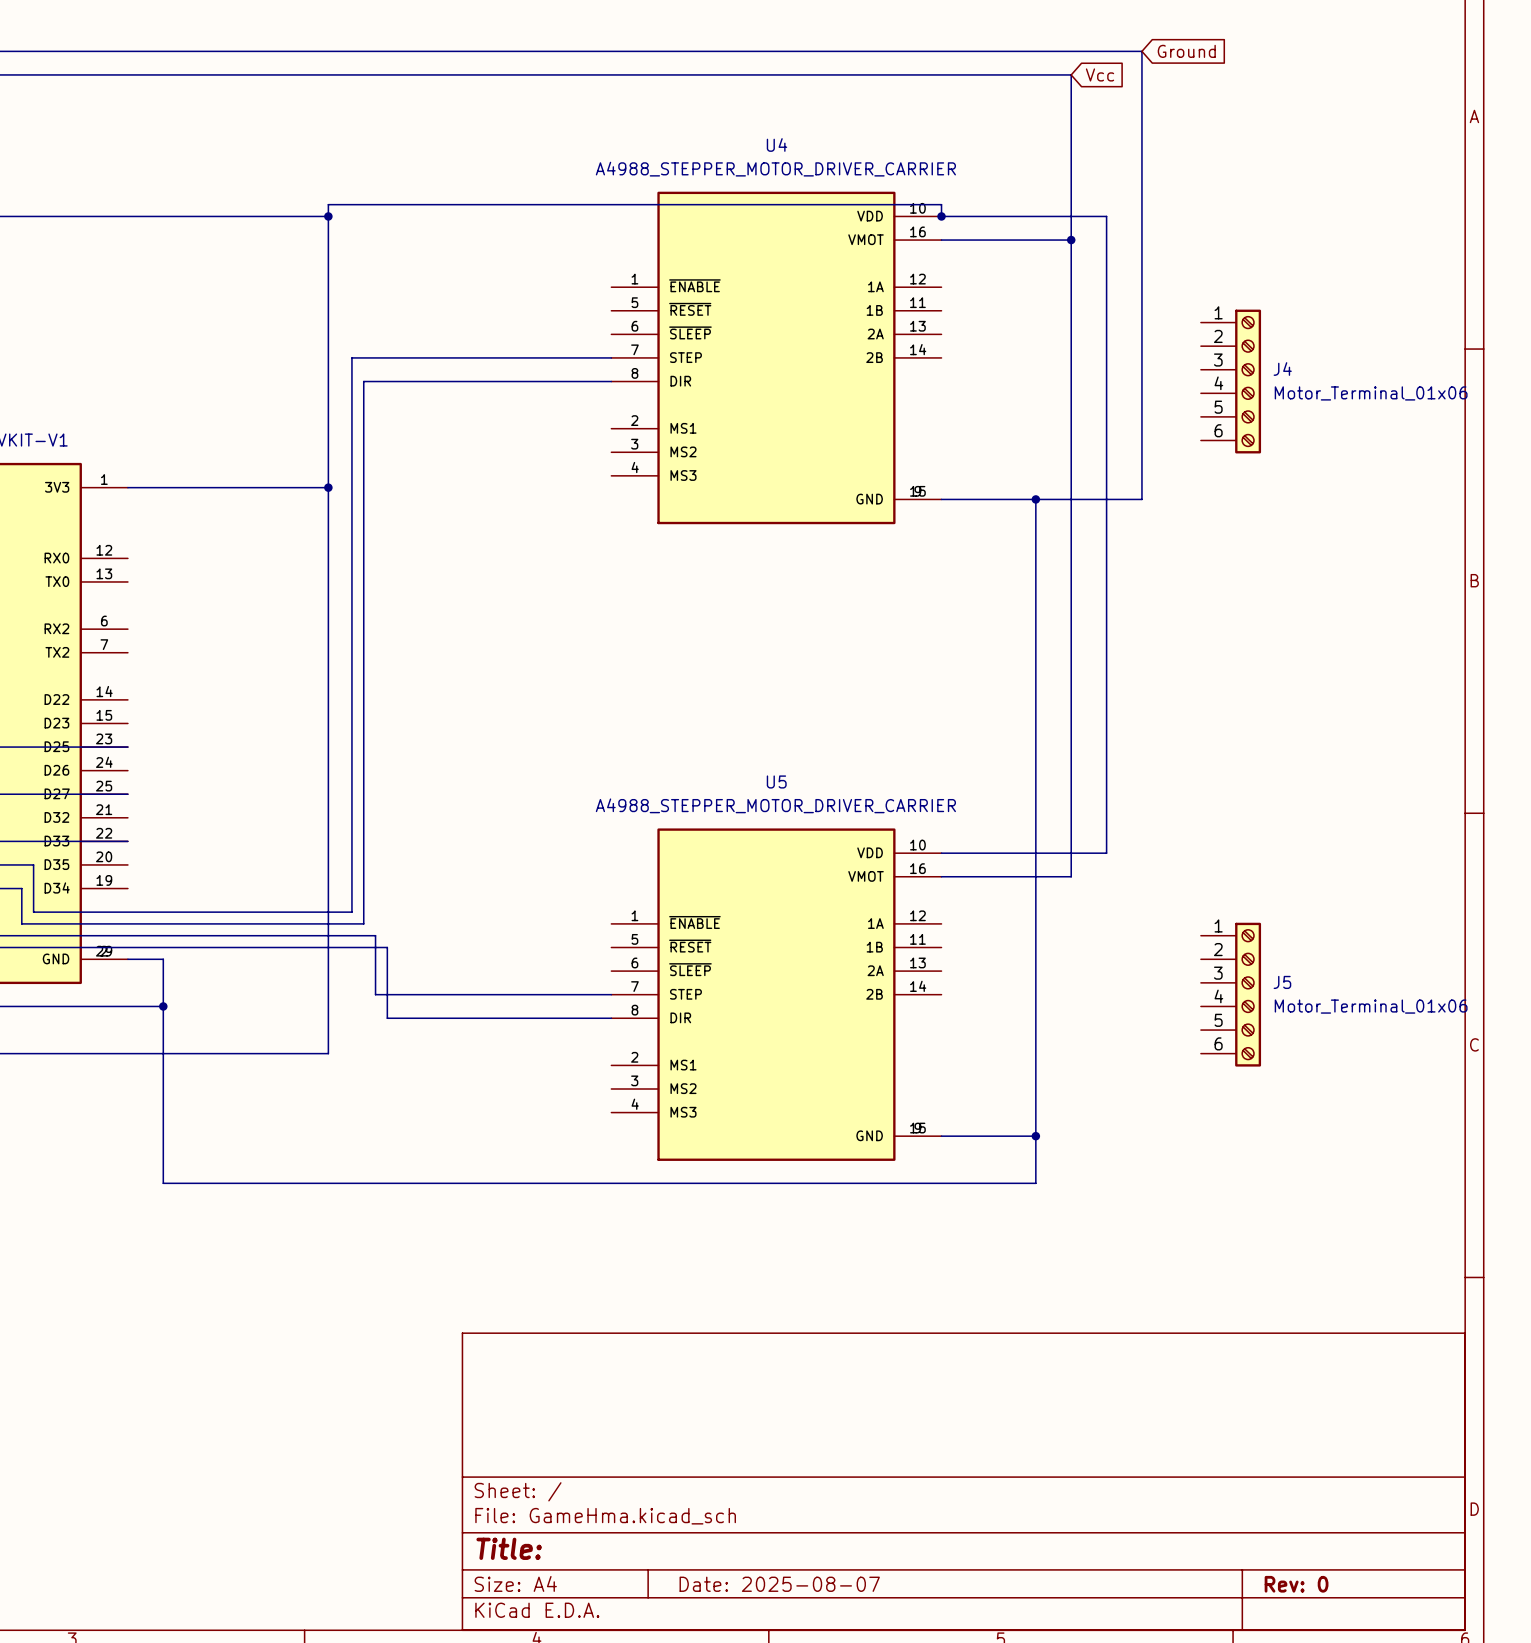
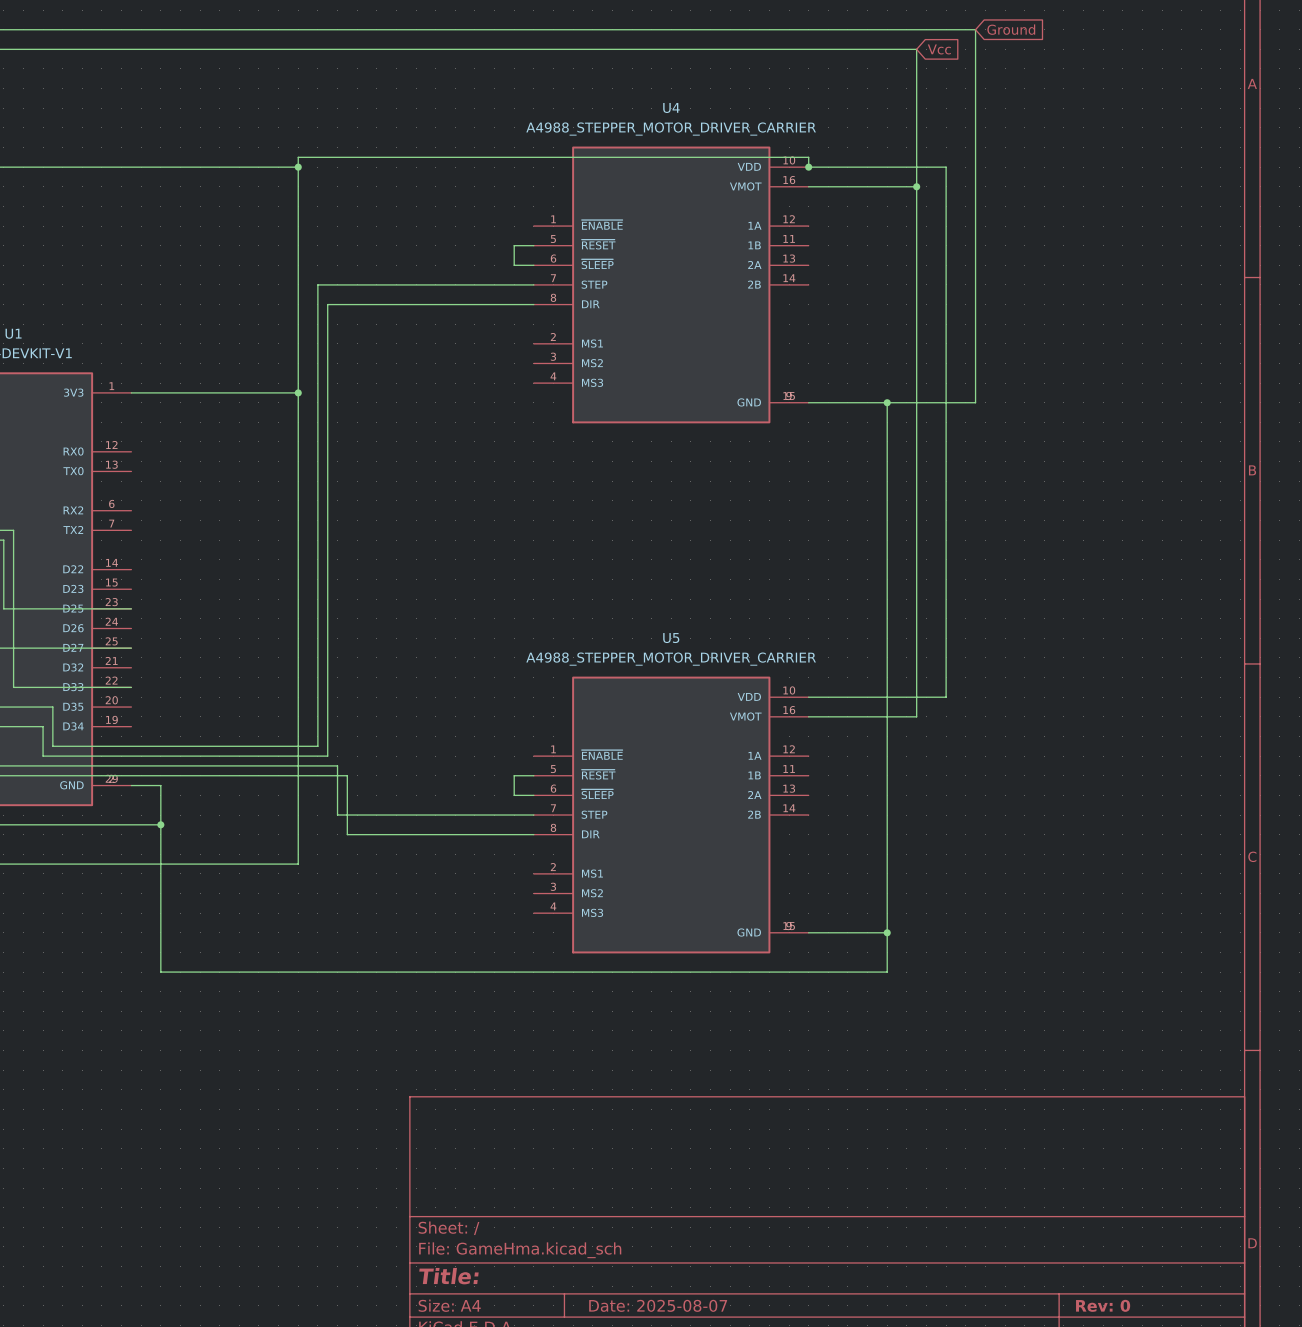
wire: none -> (533, 245) (514, 245) (514, 265) (533, 265)
J4: Motor_Terminal_01x06 (1230, 381) -> none
wire: none -> (533, 775) (514, 775) (514, 795) (533, 795)
J5: Motor_Terminal_01x06 (1230, 994) -> none

